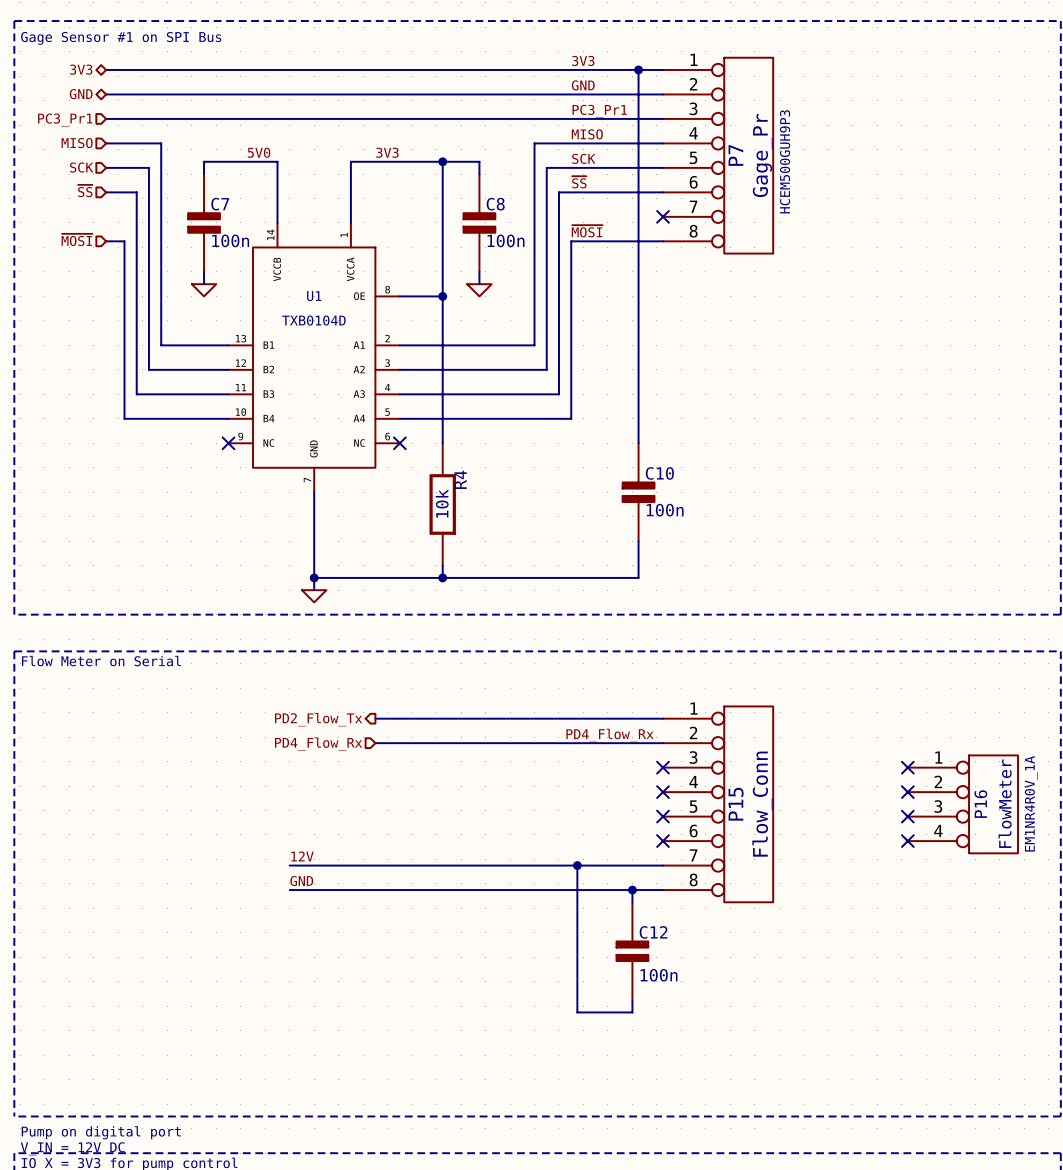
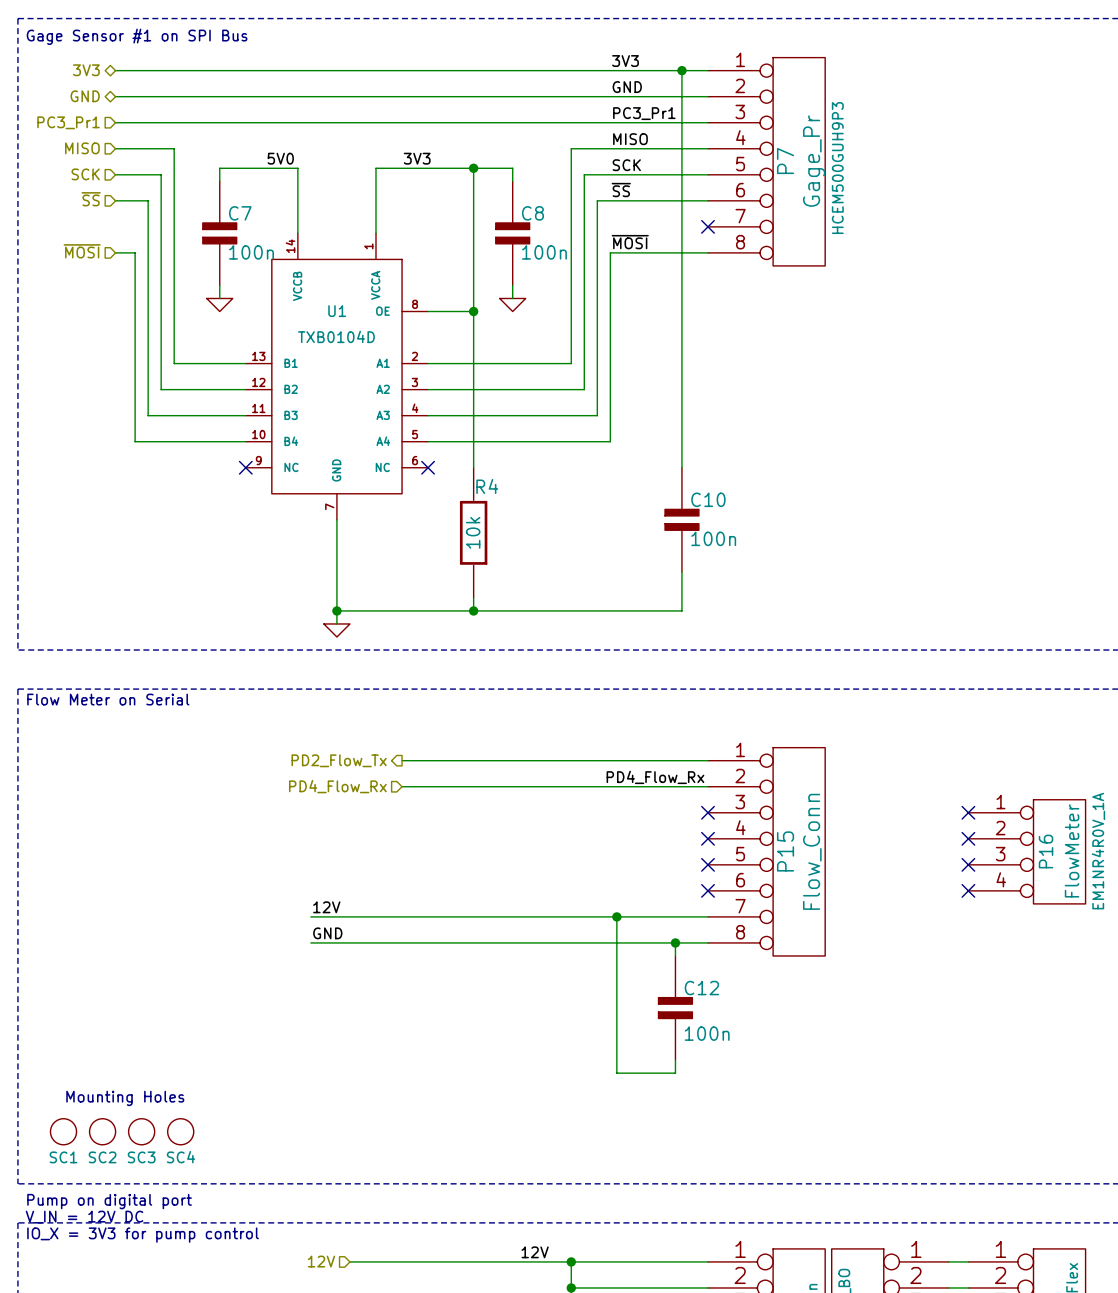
R4 name rotation: 0° (460, 479) -> 90° clockwise (487, 486)
text: none -> Mounting Holes (125, 1098)
SC1: none -> (63, 1131)
SC2: none -> (102, 1131)
SC3: none -> (141, 1131)
SC4: none -> (180, 1131)

